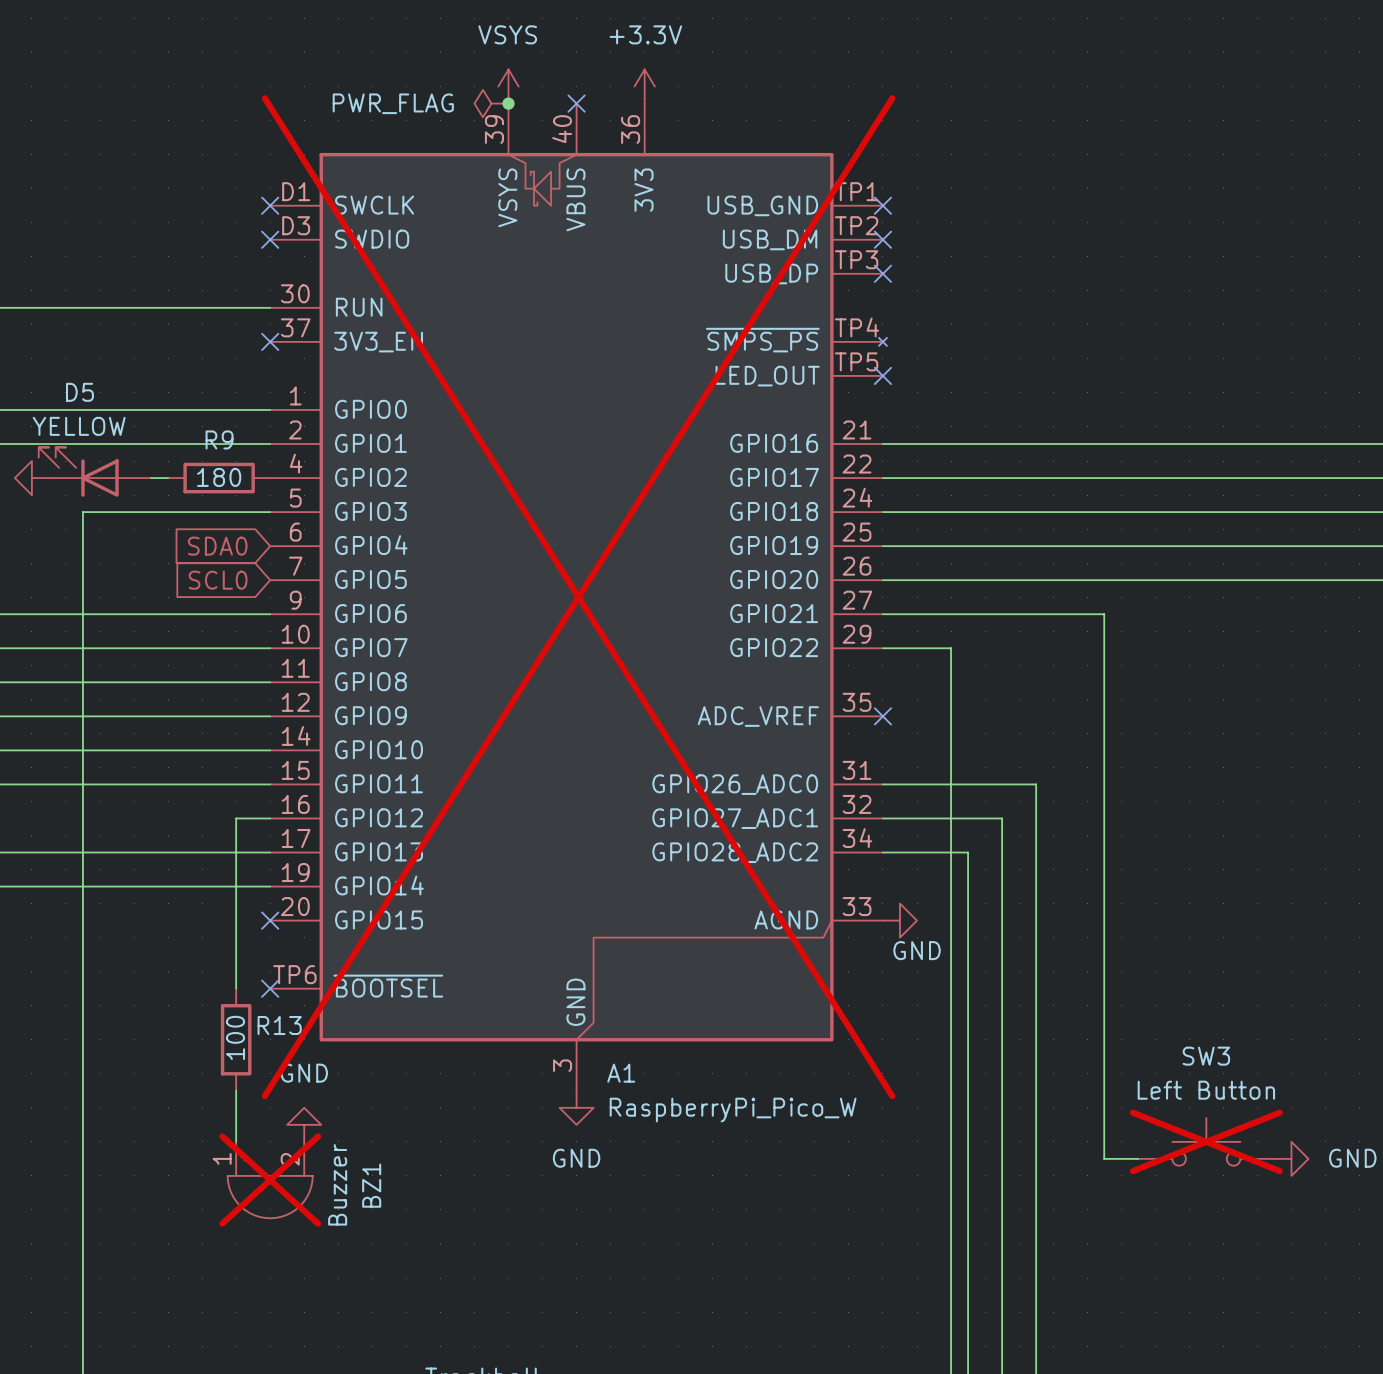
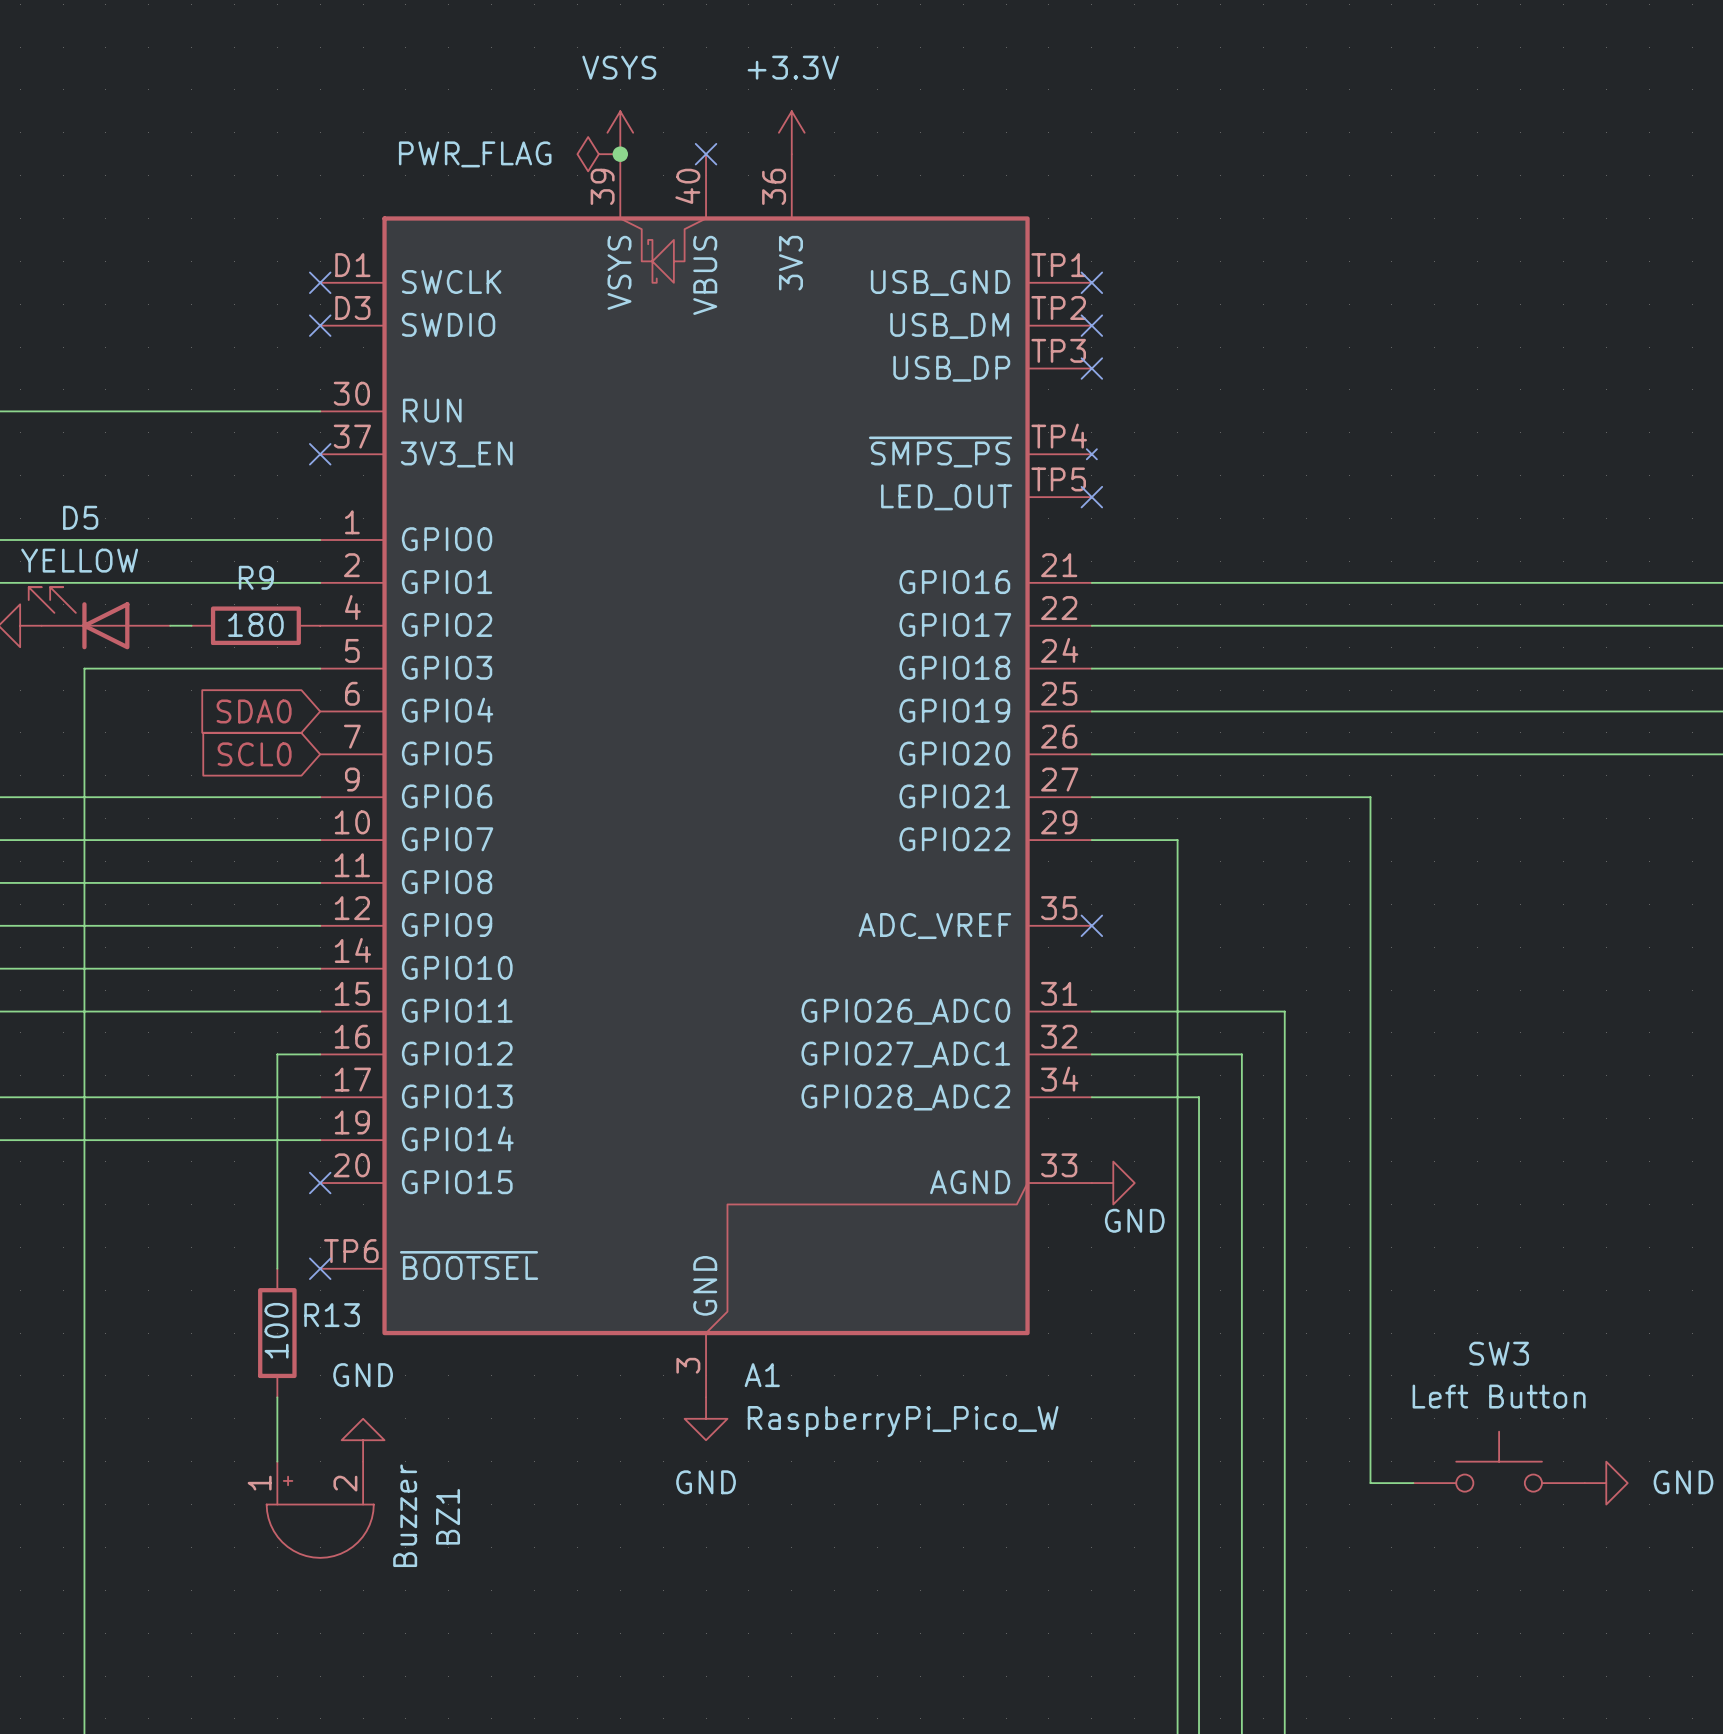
A1 do-not-place cross: (578, 597) -> none
SW3 do-not-place cross: (1206, 1141) -> none
BZ1 do-not-place cross: (270, 1180) -> none

